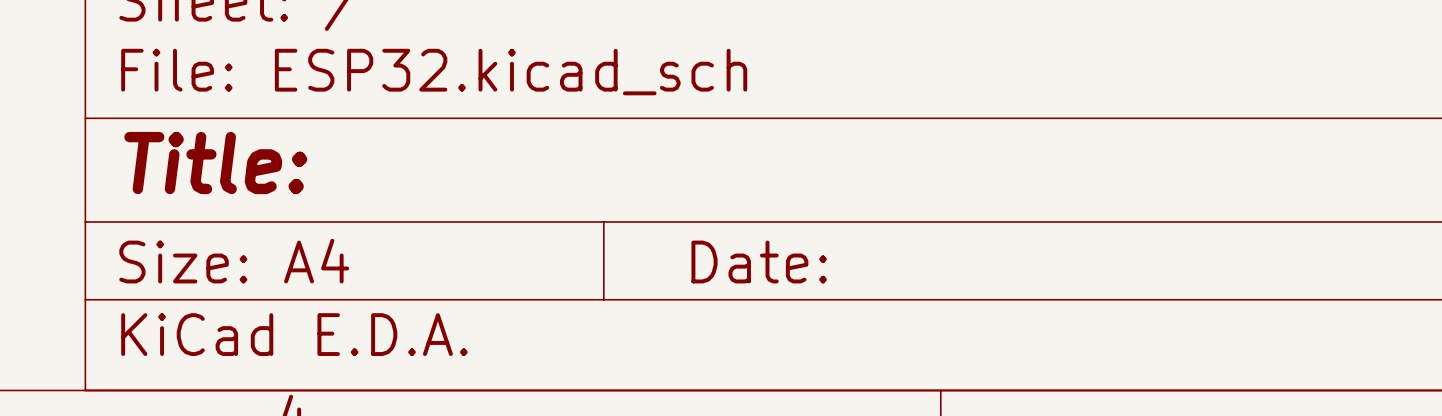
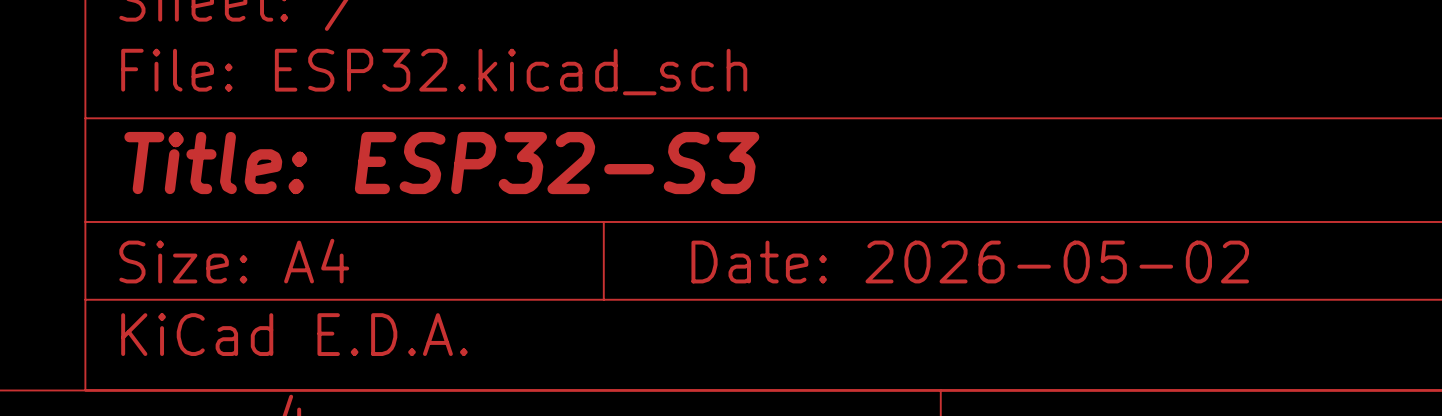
title block: Title: (215, 163) -> Title: ESP32-S3 (441, 163)
title block: Date: (759, 262) -> Date: 2026-05-02 (970, 262)

